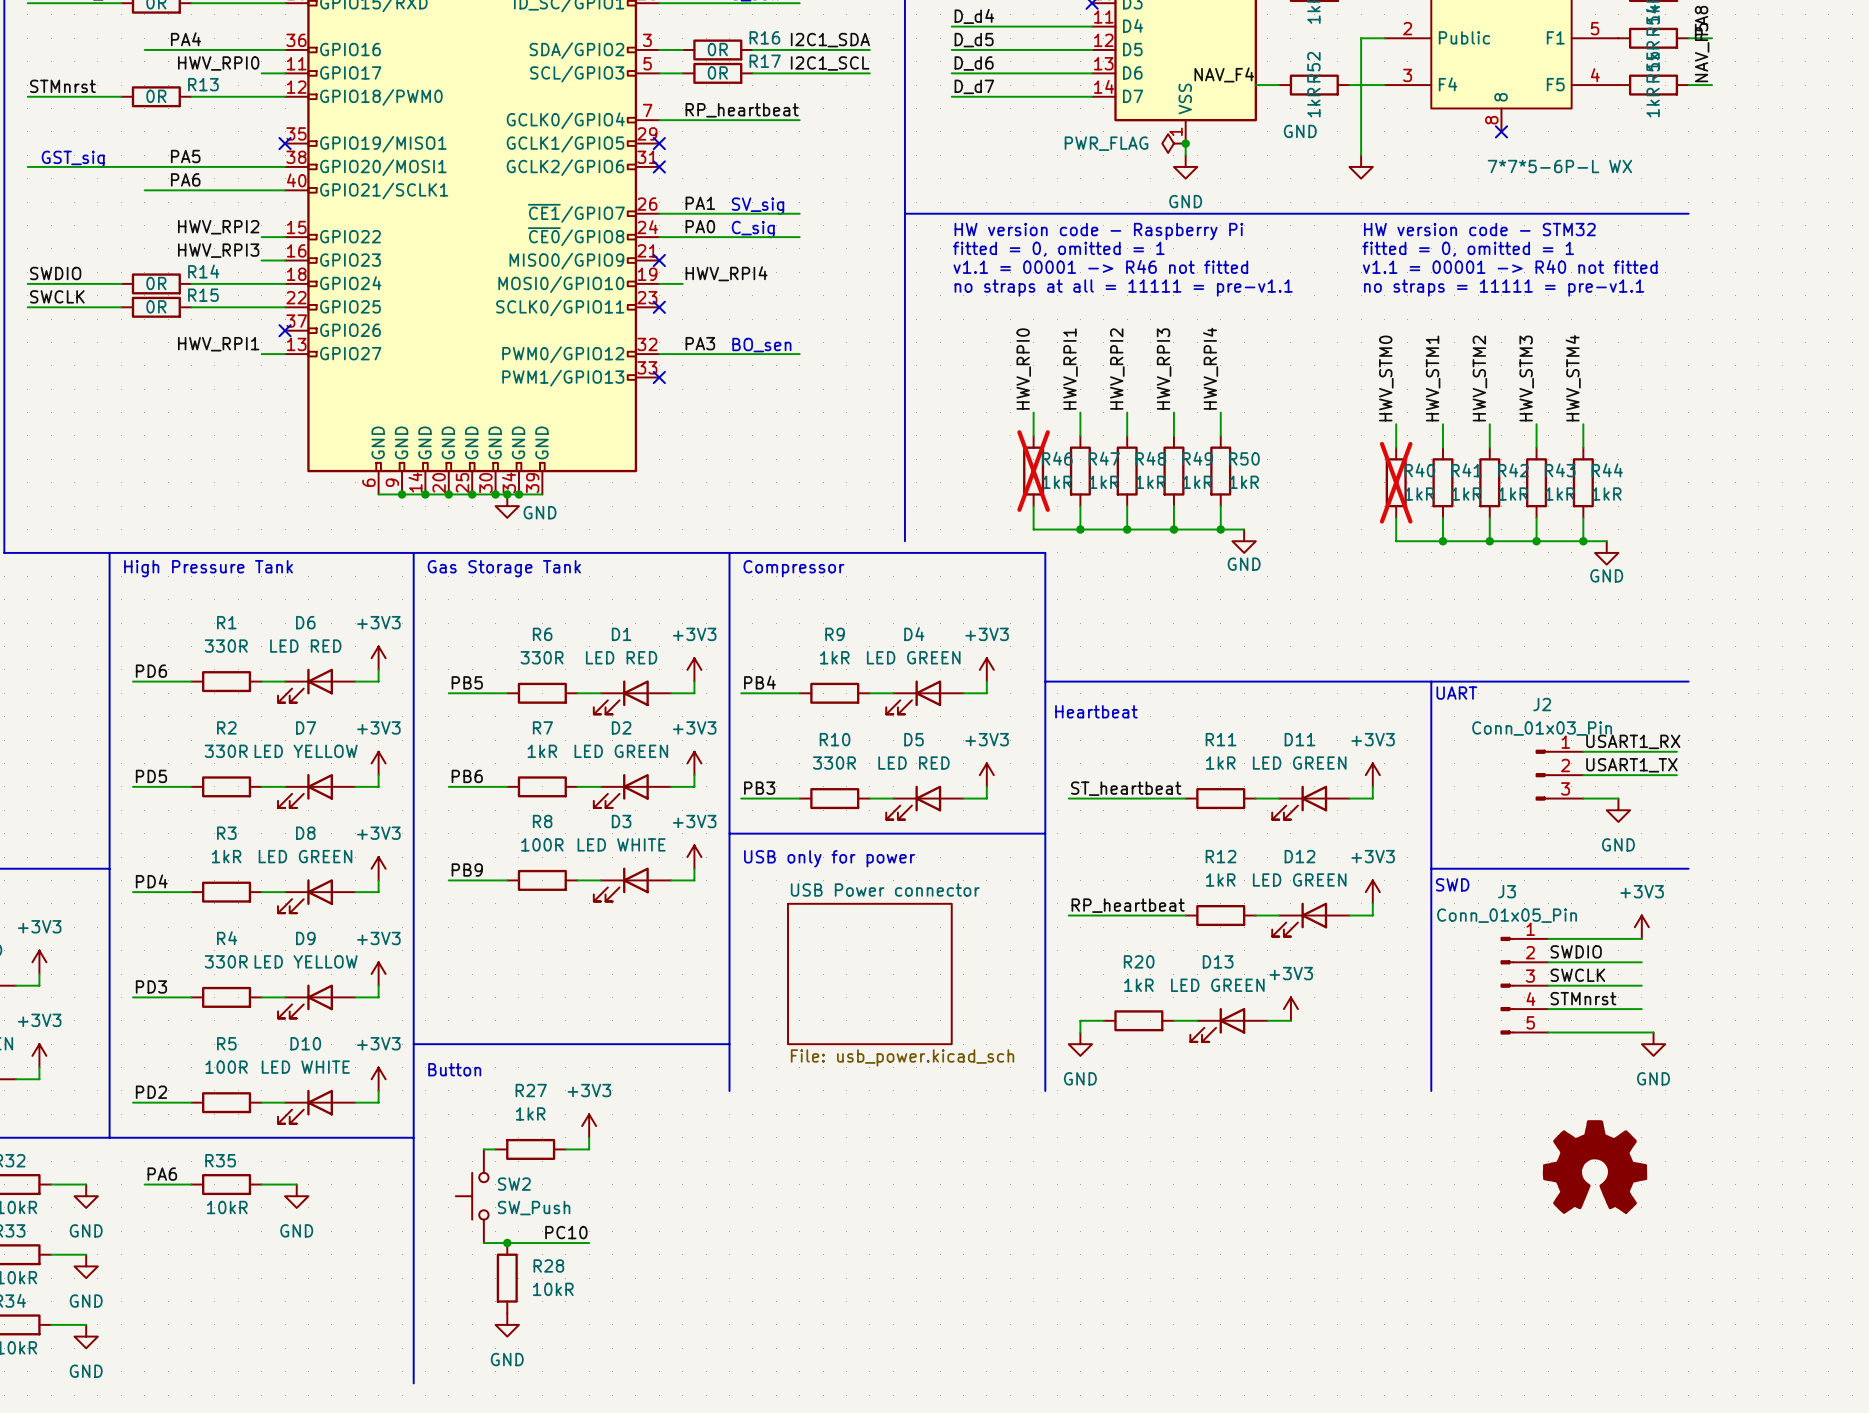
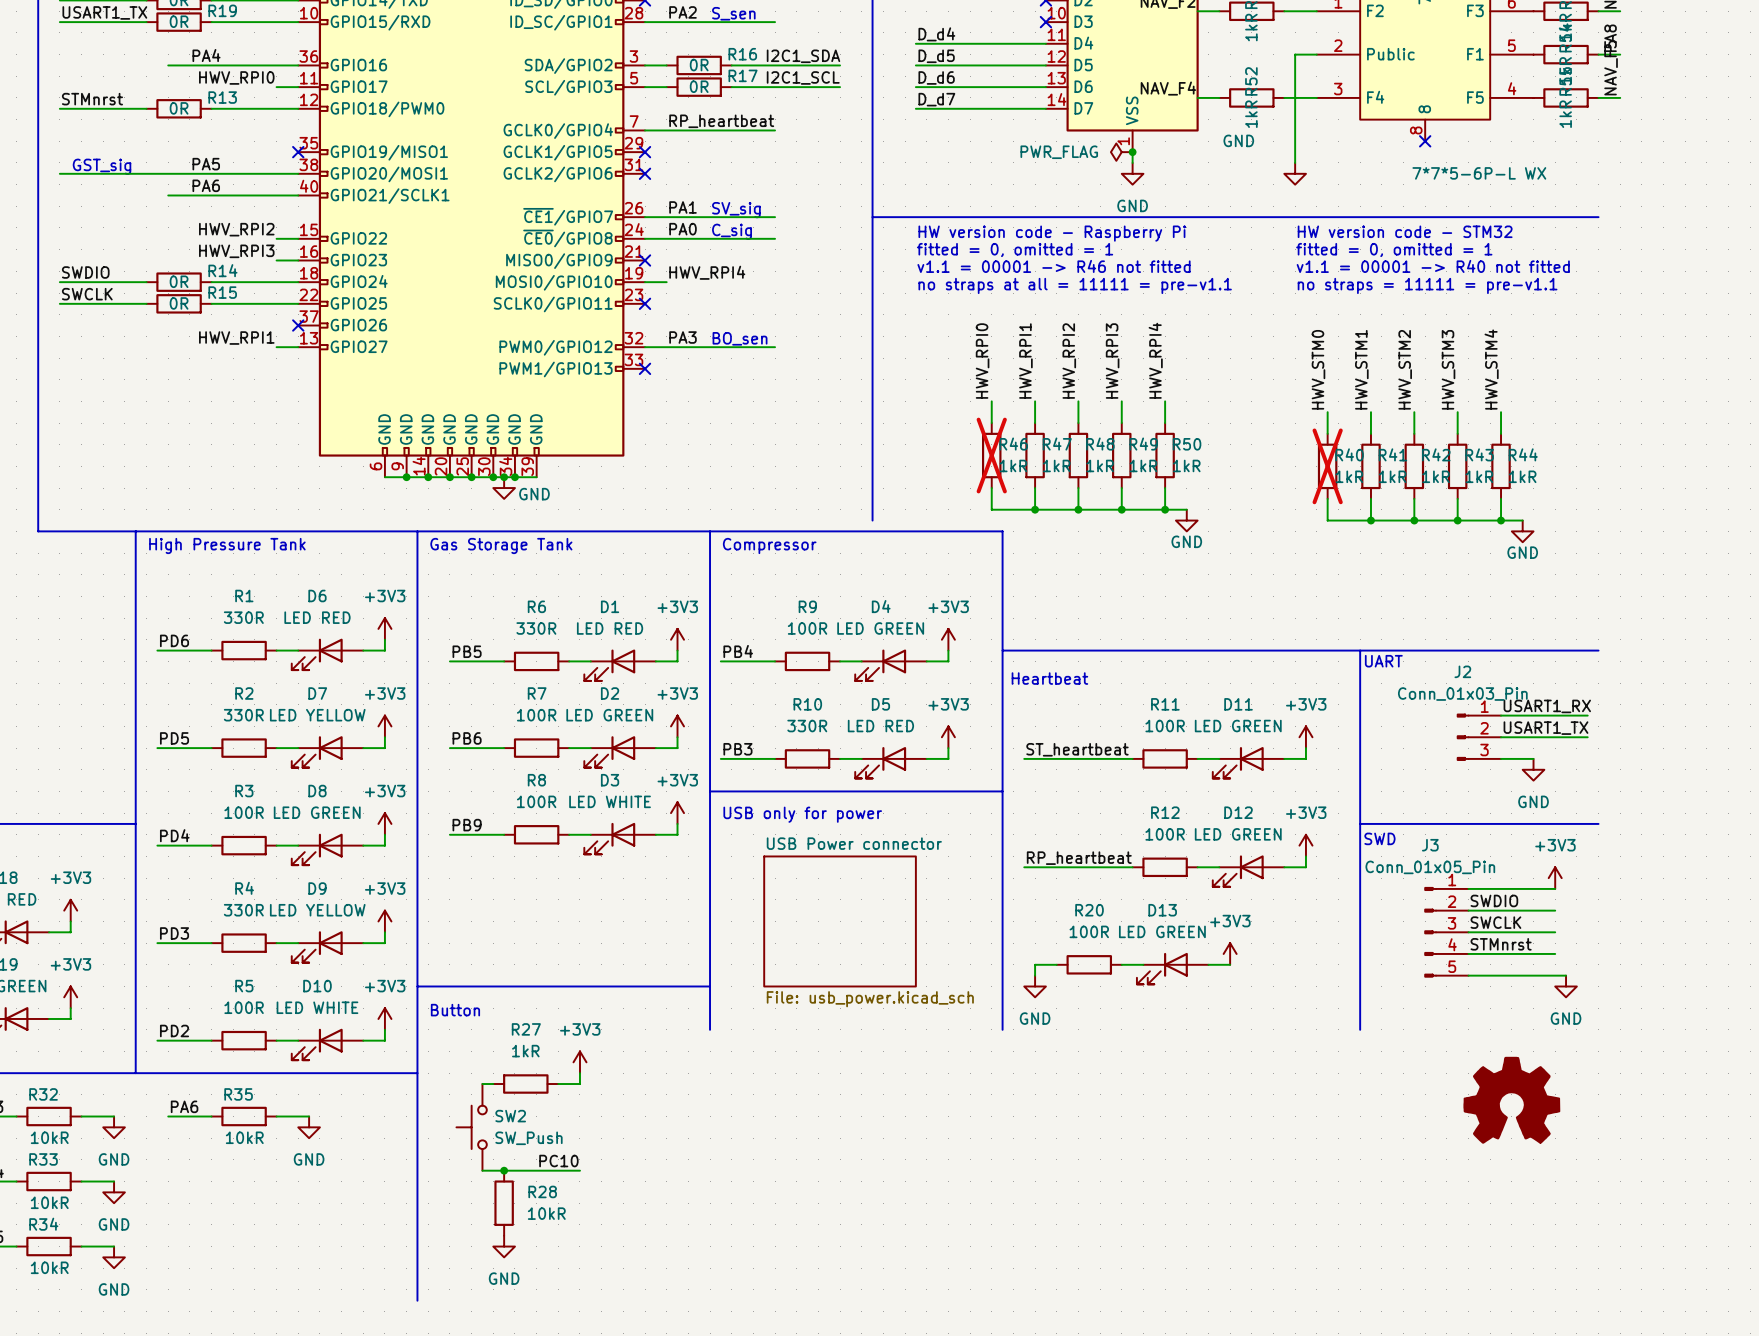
R9 value: 1kR (834, 657) -> 100R (807, 628)
R7 value: 1kR (542, 751) -> 100R (536, 715)
R11 value: 1kR (1220, 763) -> 100R (1165, 726)
R3 value: 1kR (226, 856) -> 100R (244, 812)
R12 value: 1kR (1220, 879) -> 100R (1165, 834)
R20 value: 1kR (1138, 985) -> 100R (1089, 931)

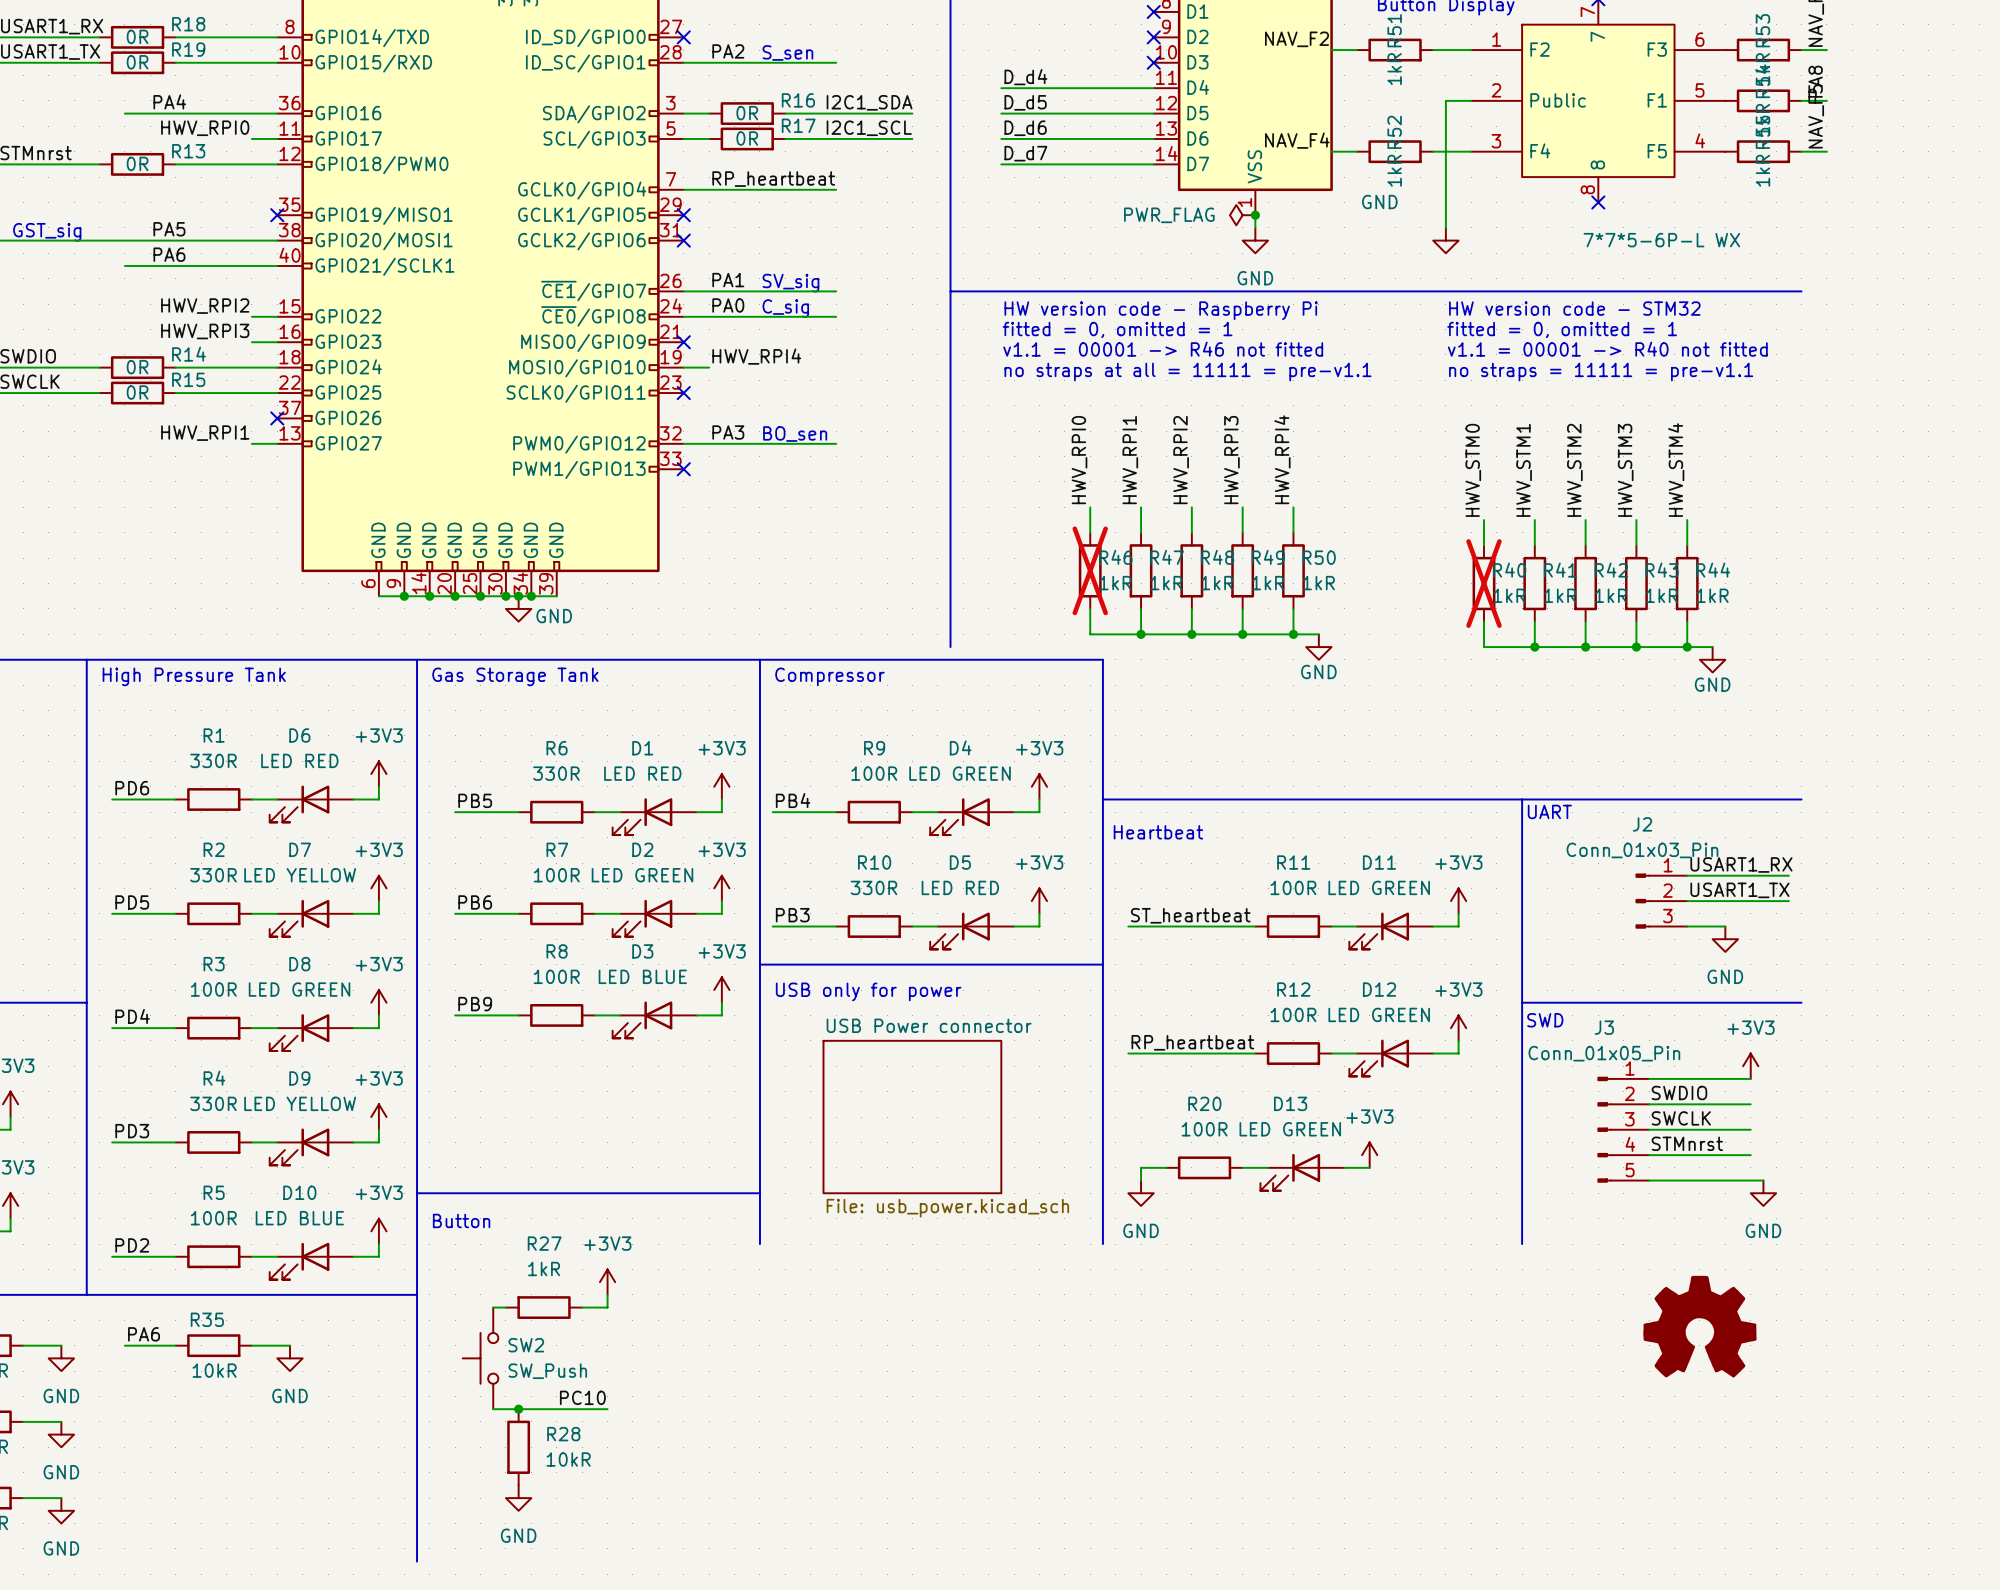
D3 value: LED WHITE (610, 801) -> LED BLUE (642, 976)
D10 value: LED WHITE (317, 1007) -> LED BLUE (299, 1218)

